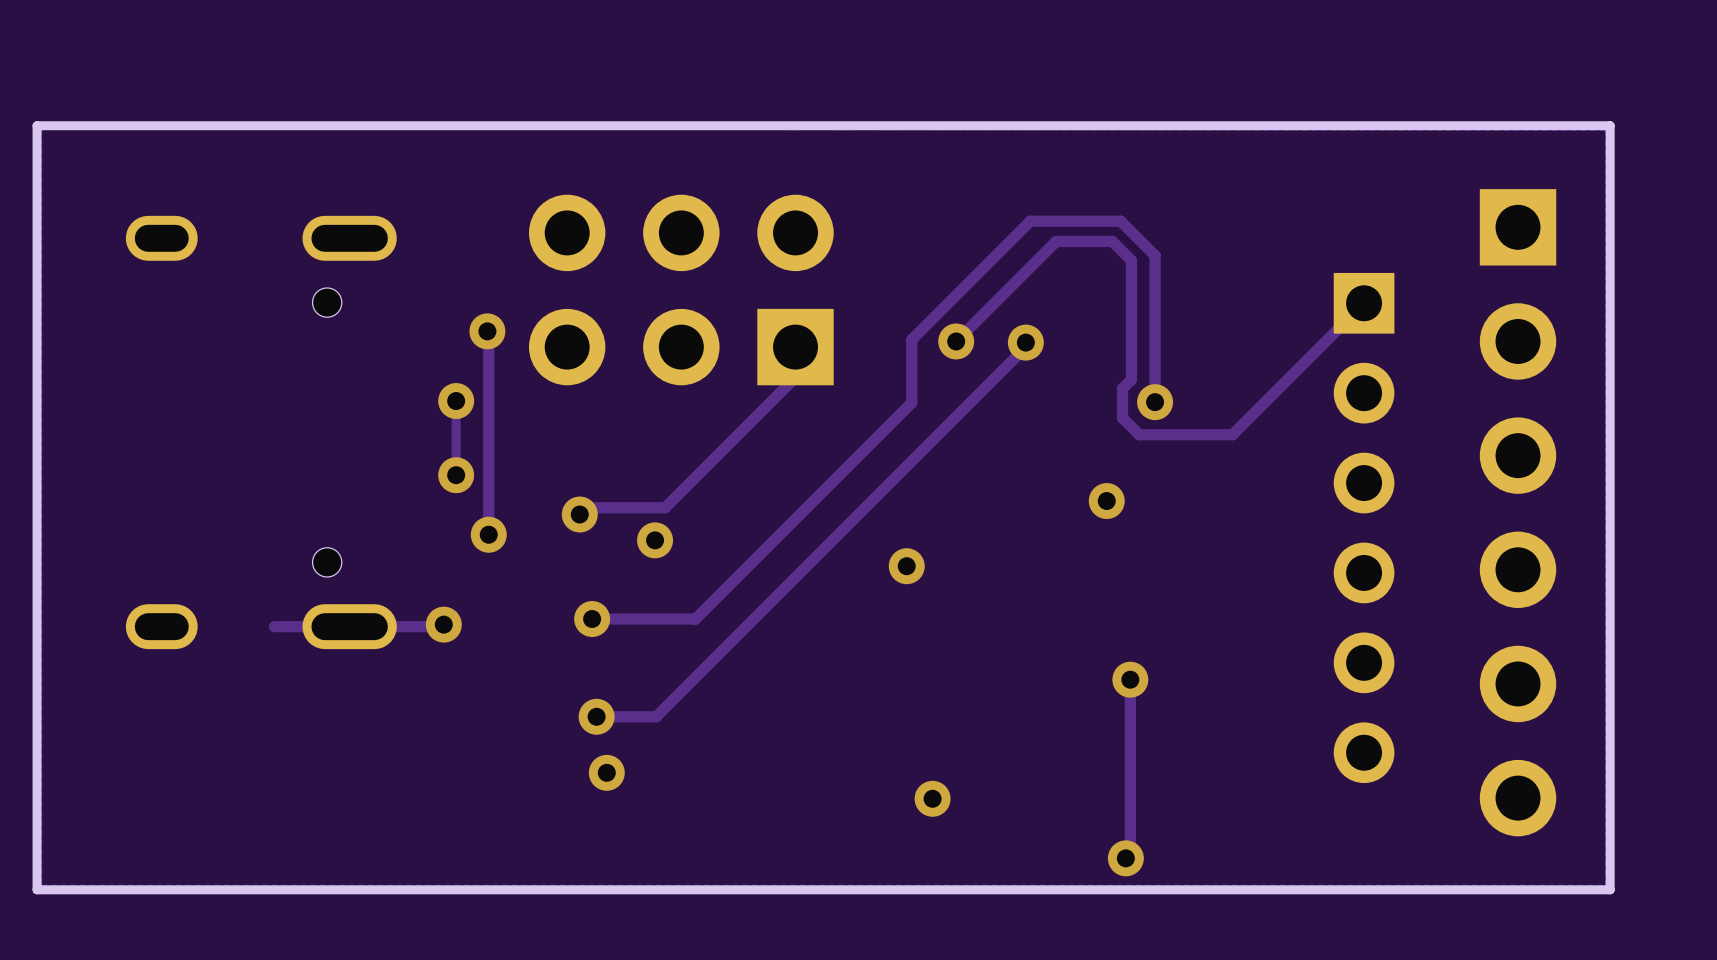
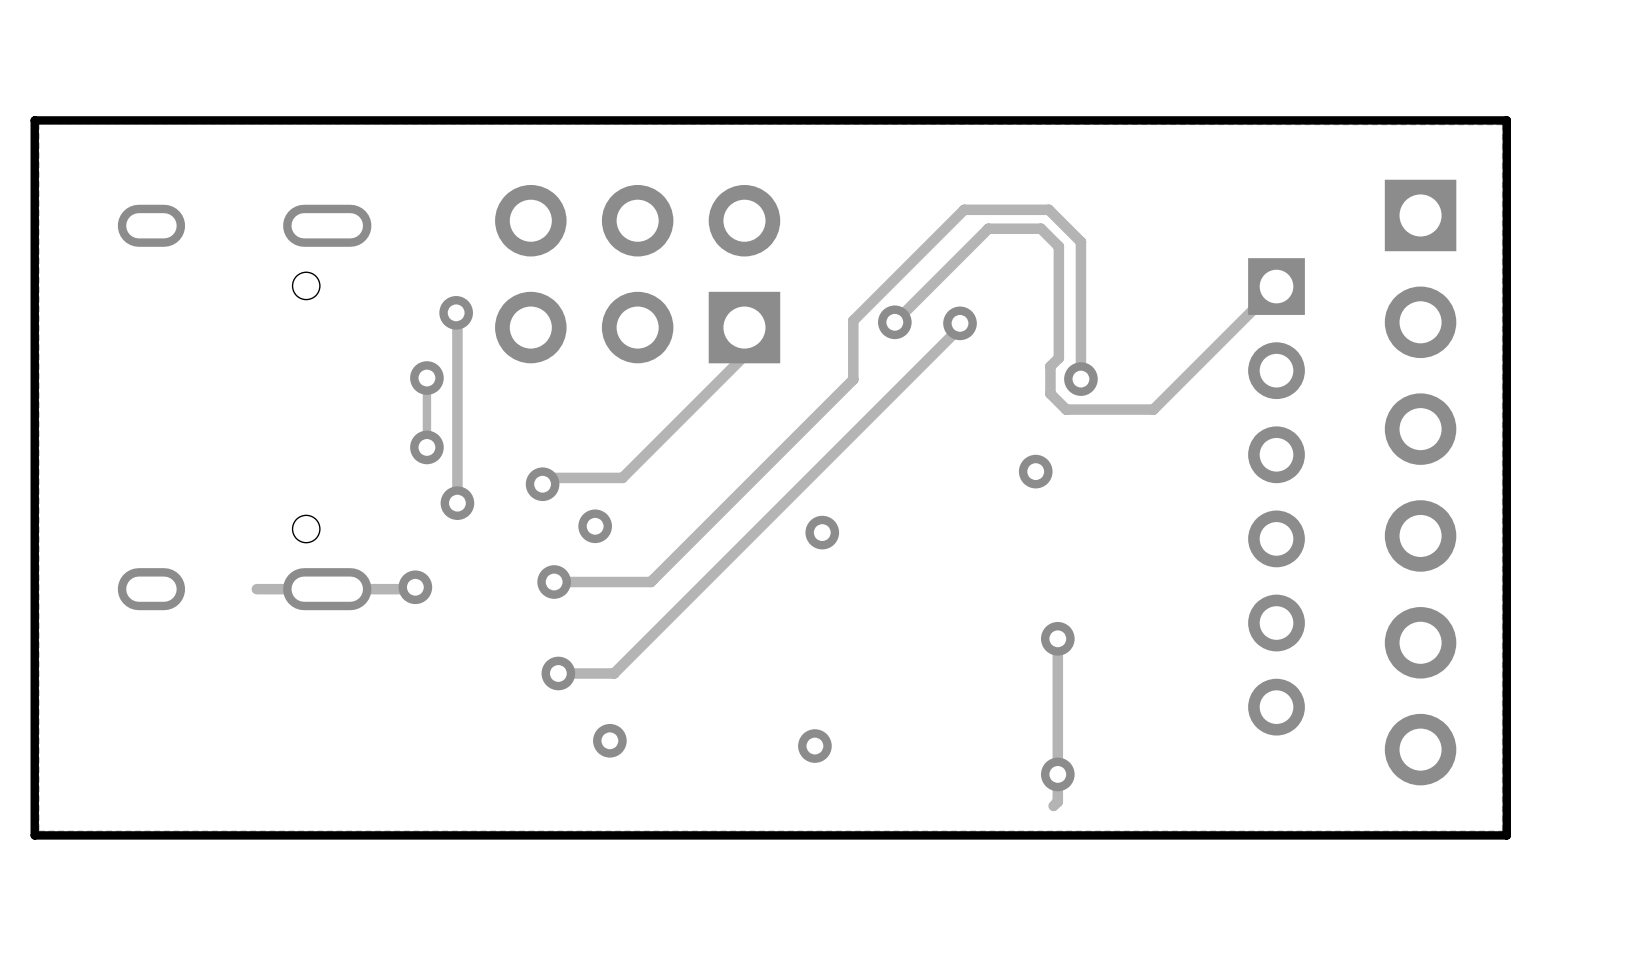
via position: (655, 540) -> (595, 526)
via position: (906, 566) -> (822, 532)
via position: (606, 772) -> (609, 740)
via position: (932, 798) -> (814, 746)
via position: (1125, 858) -> (1057, 774)

